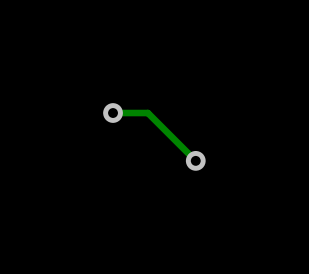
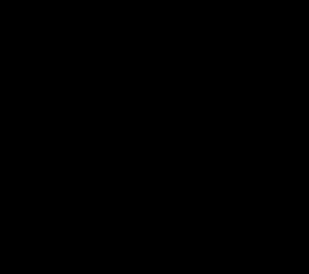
track: (113, 113) (147, 113) (195, 160) -> none
via: (113, 113) -> none
via: (195, 160) -> none

